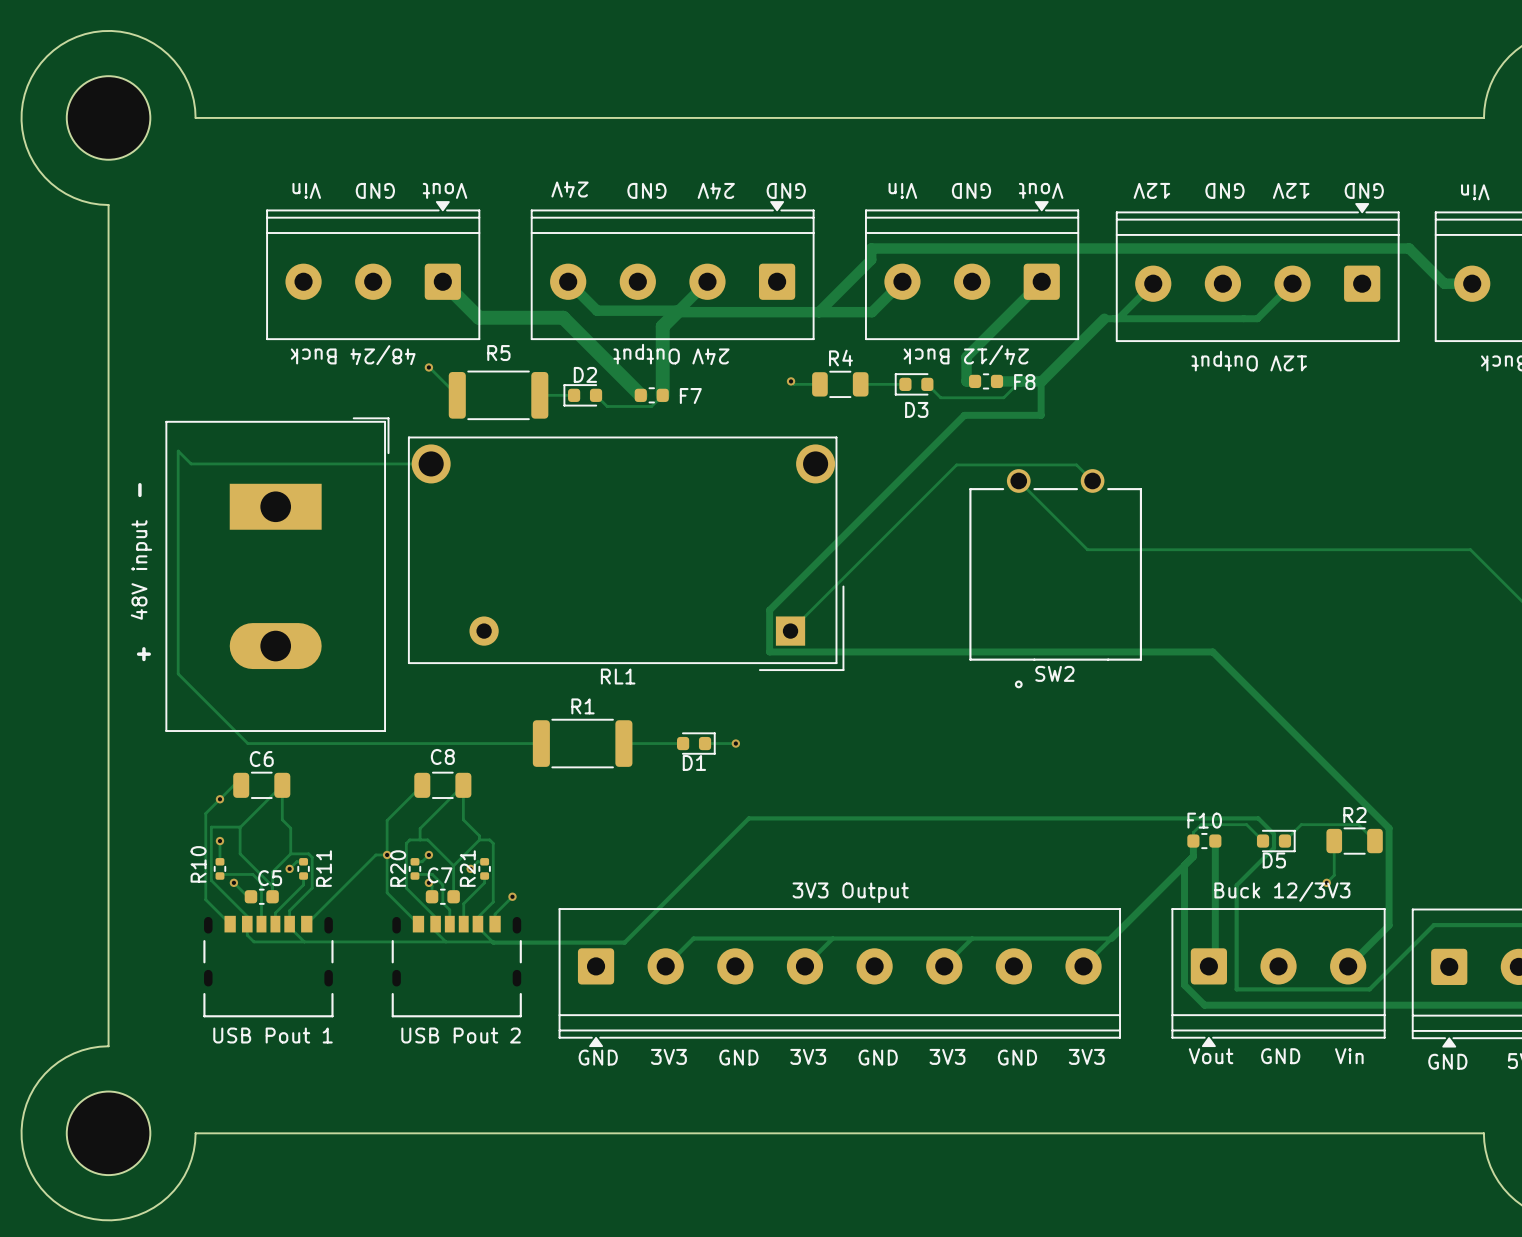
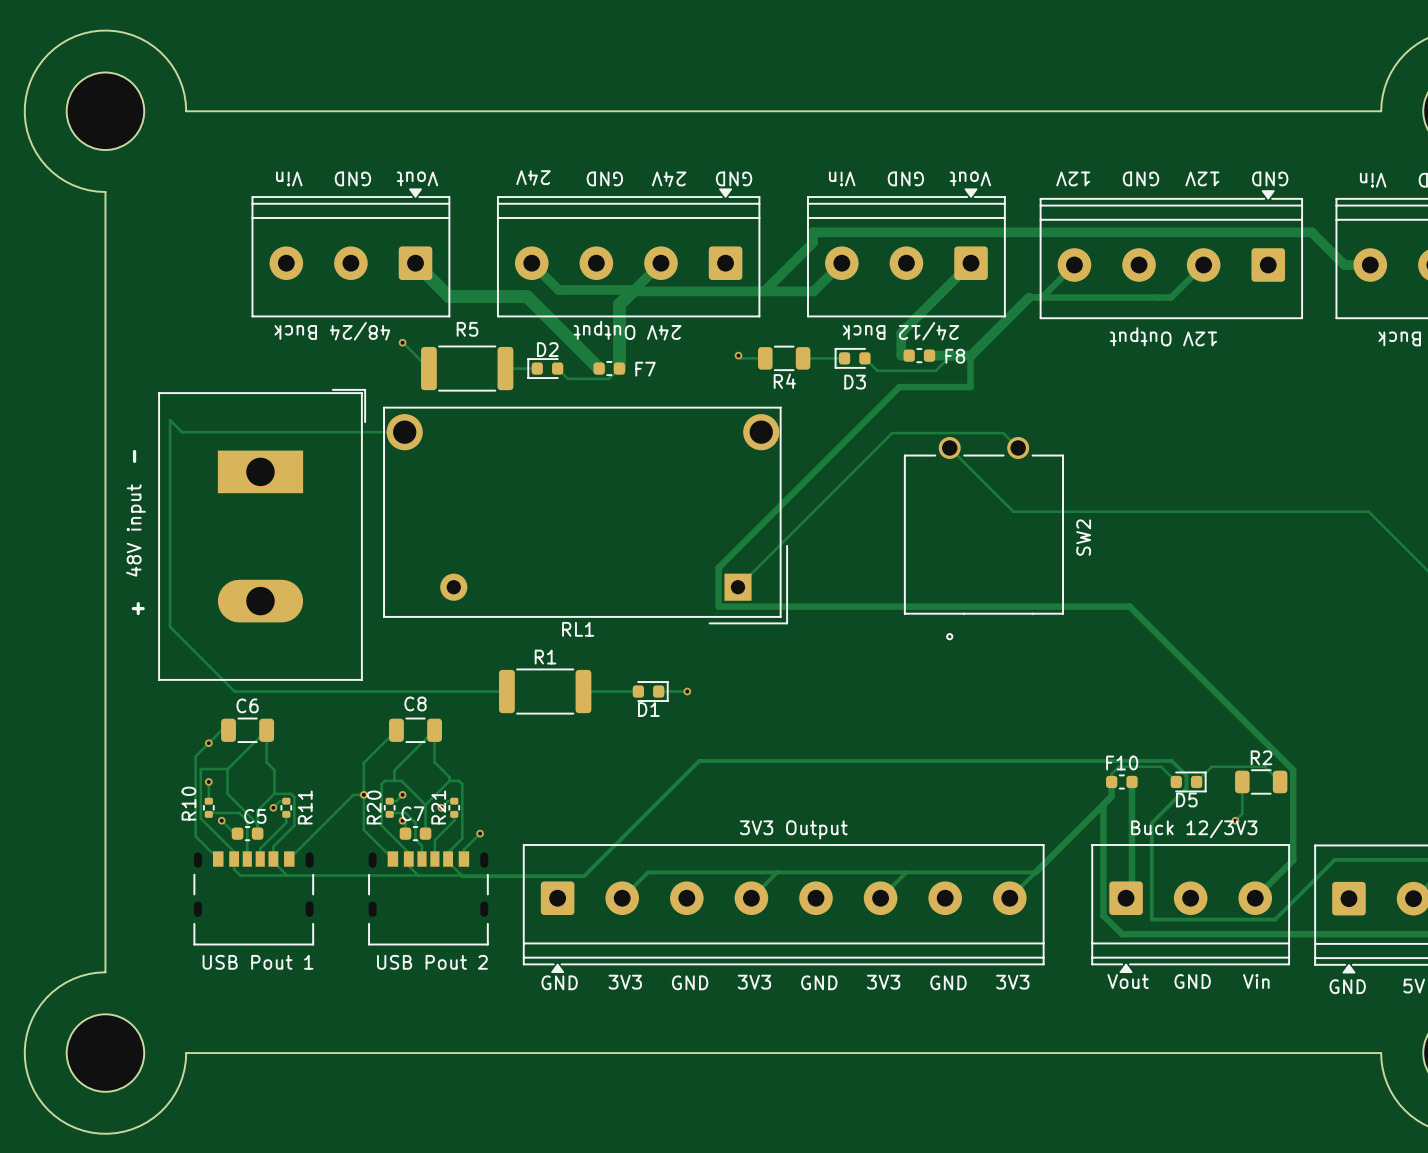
R4 name position: R4 (840, 358) -> R4 (784, 381)
SW2 name rotation: 0° (1054, 673) -> 90° counterclockwise (1083, 537)
SW2 name position: SW2 (1054, 673) -> SW2 (1083, 537)

